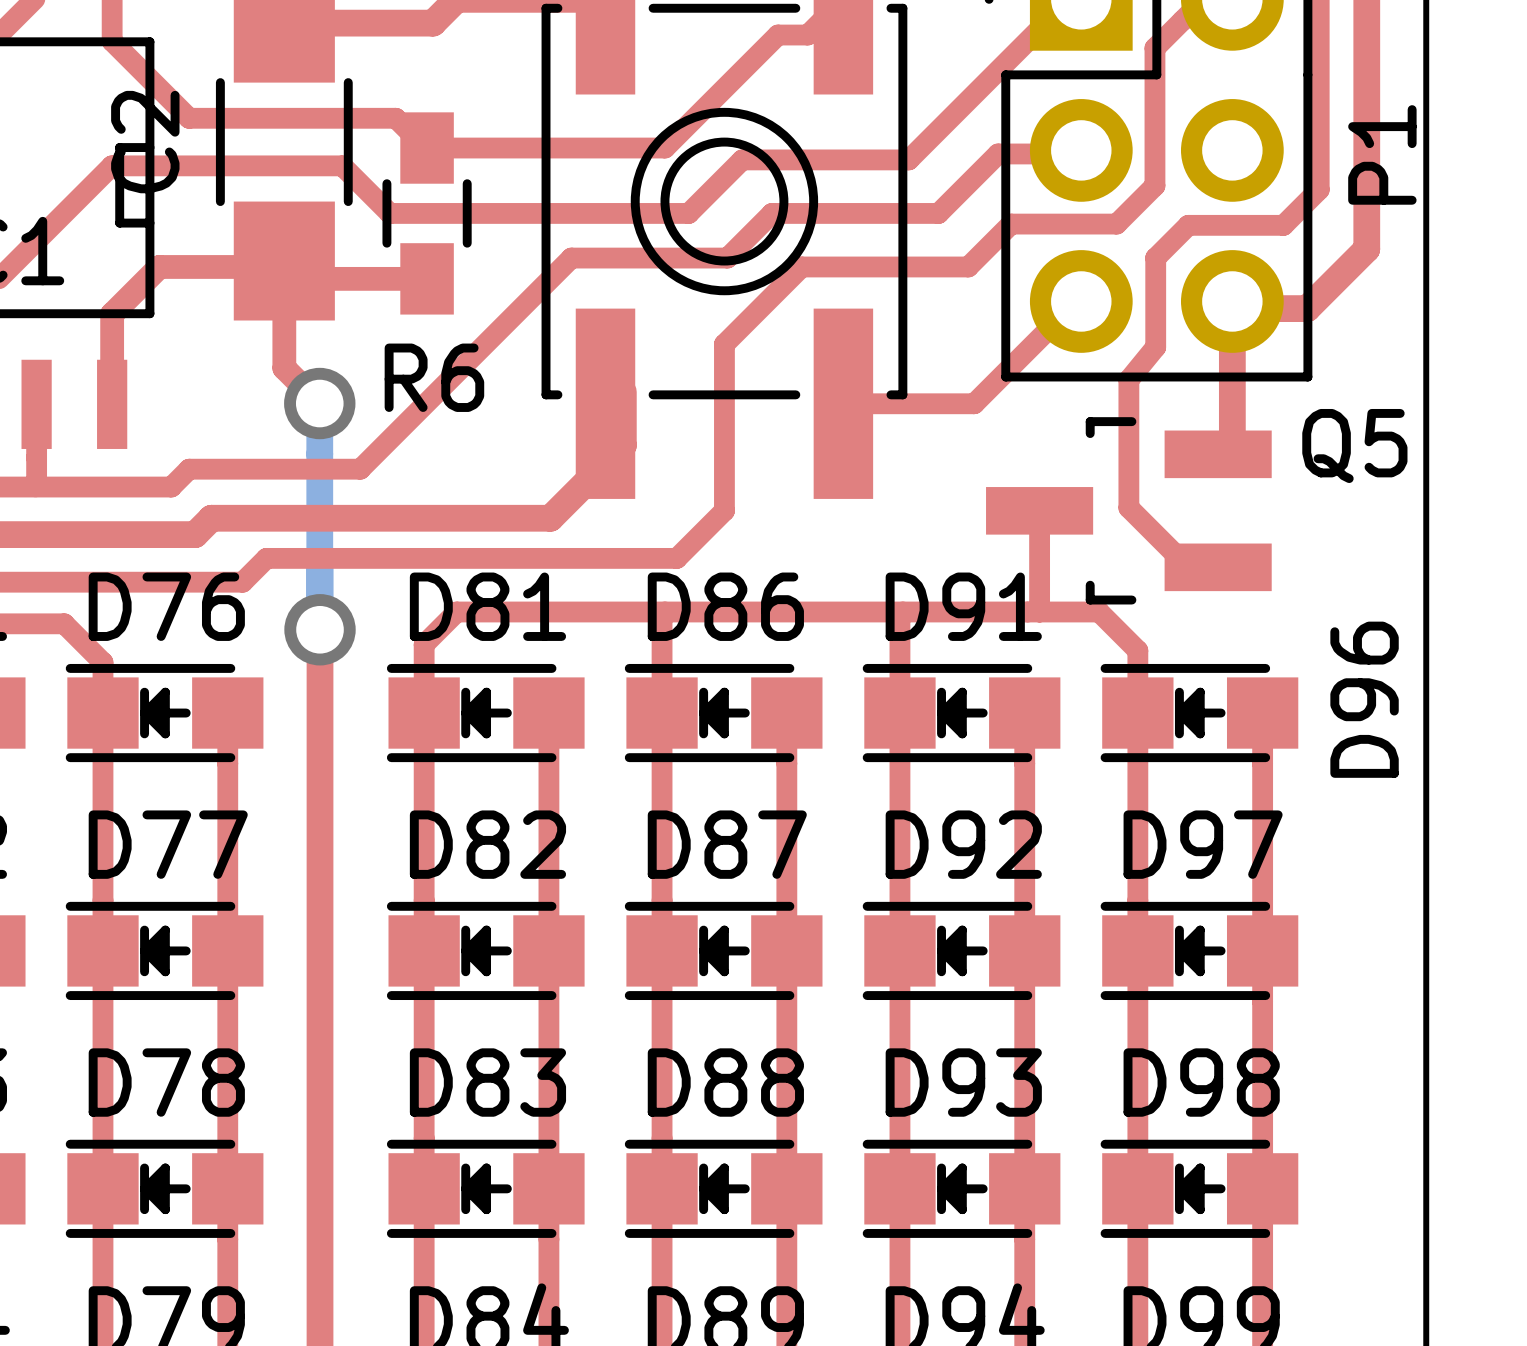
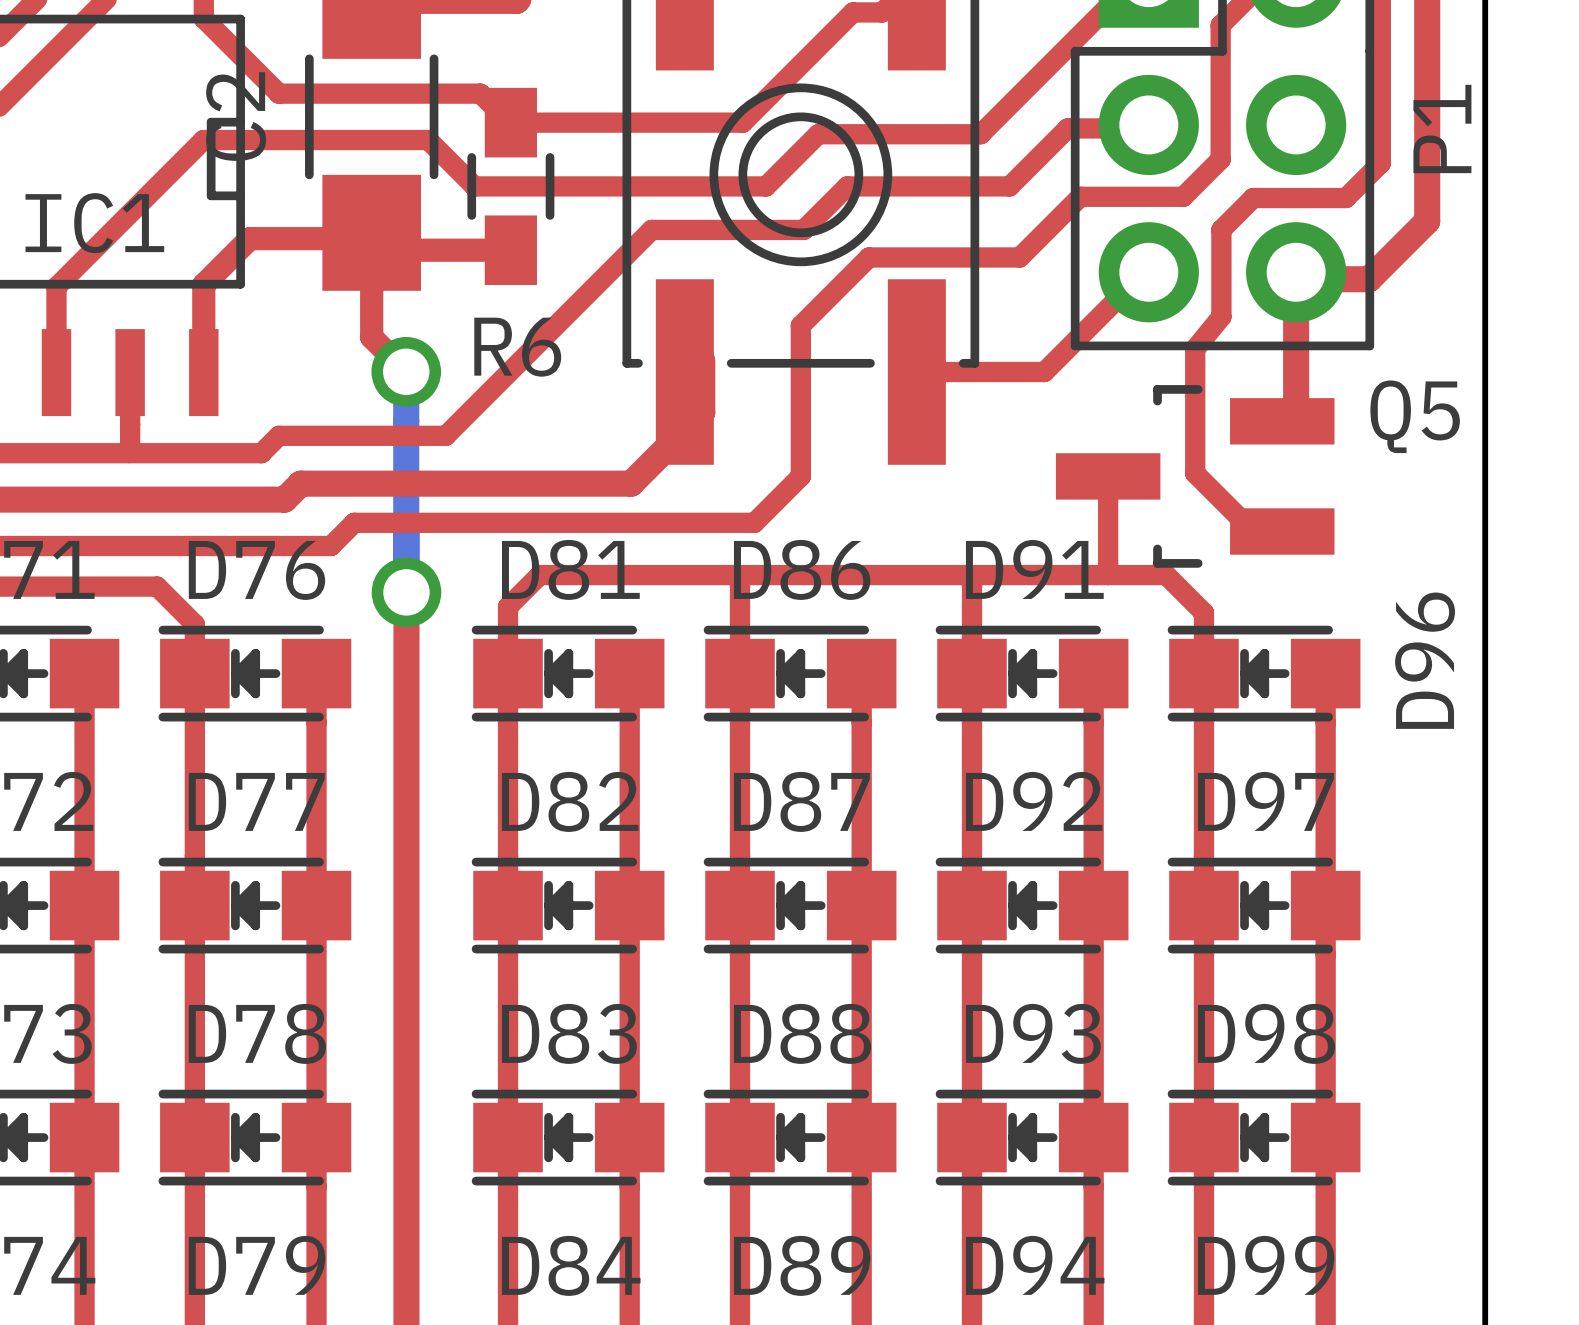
top track: (968, 266) (801, 266) (724, 344) (724, 356) -> (1038, 238) (1019, 257) (868, 257) (800, 325)

